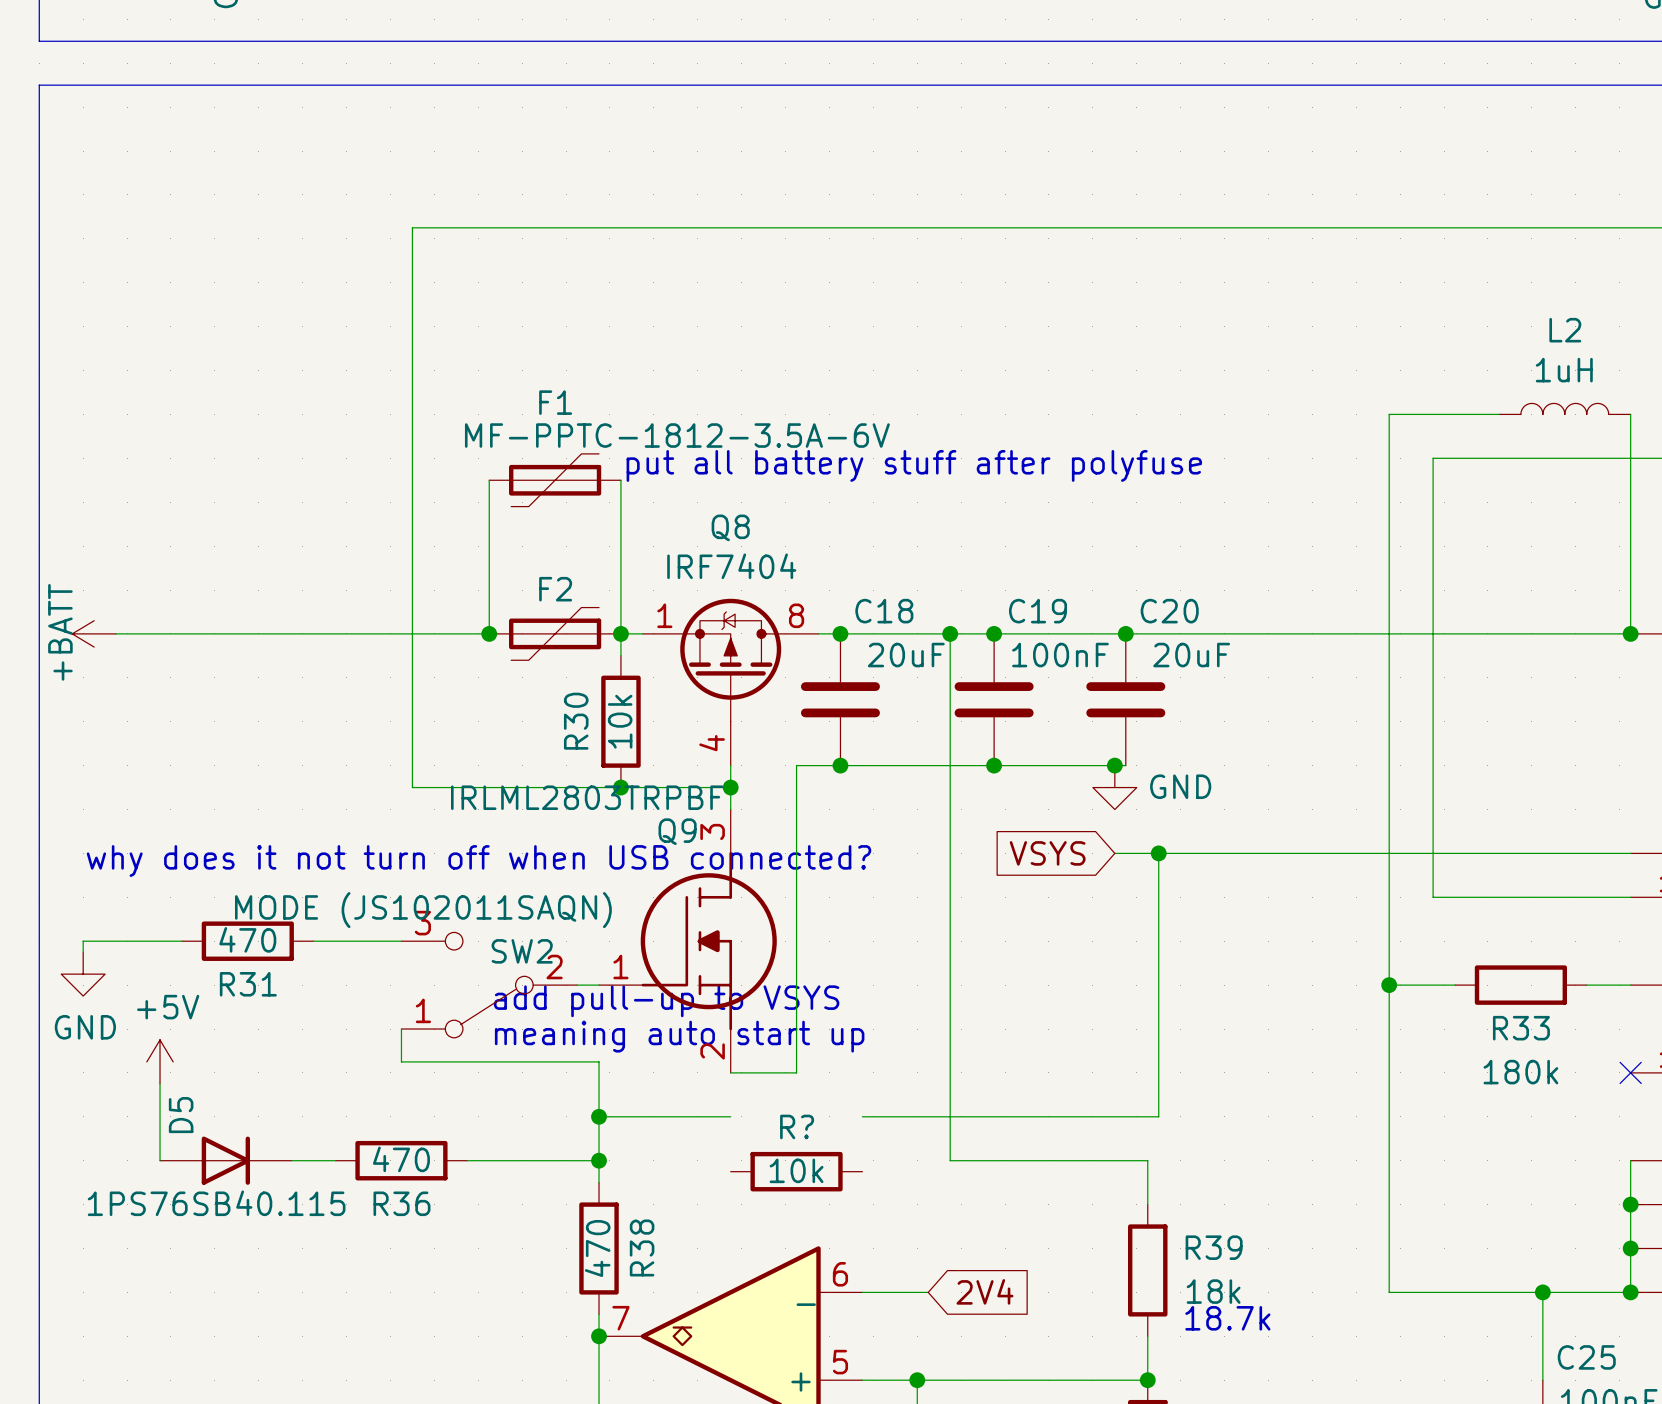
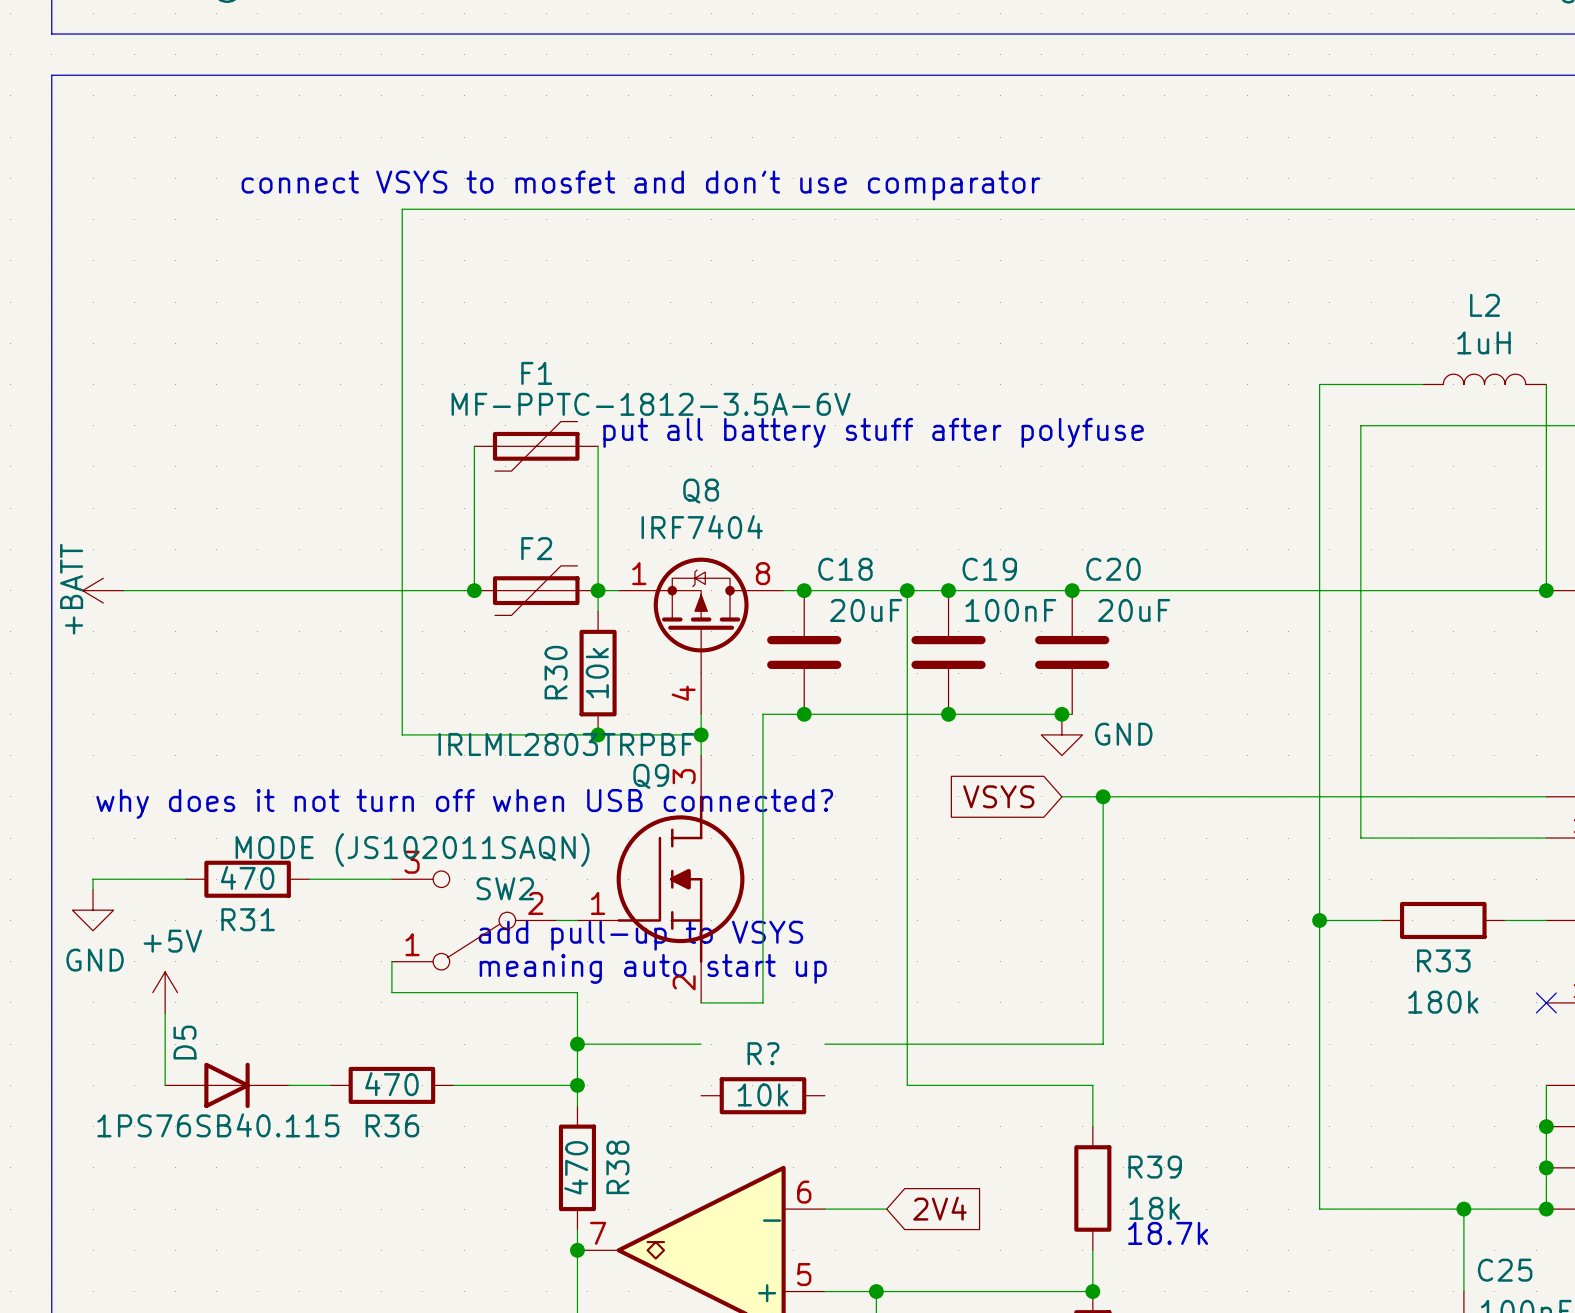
text: none -> connect VSYS to mosfet and don't use comparator (640, 185)

